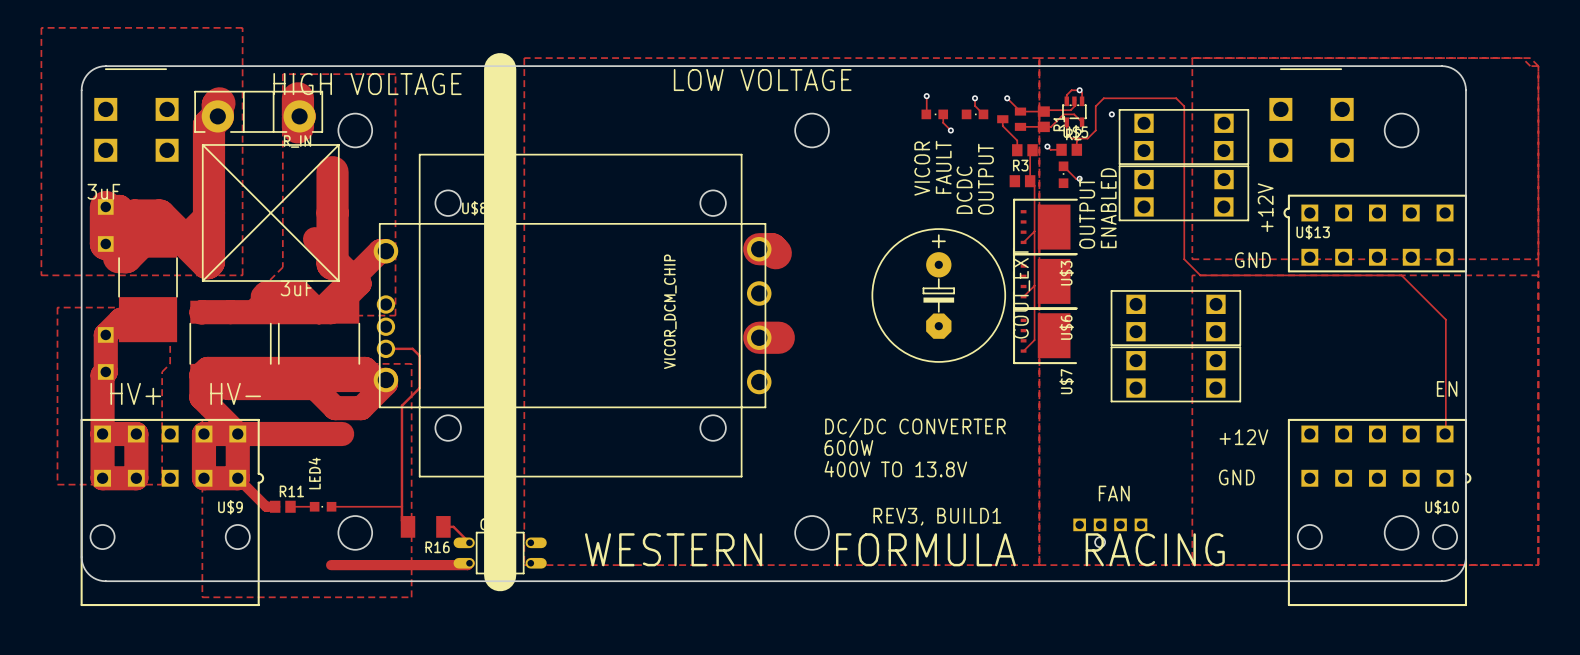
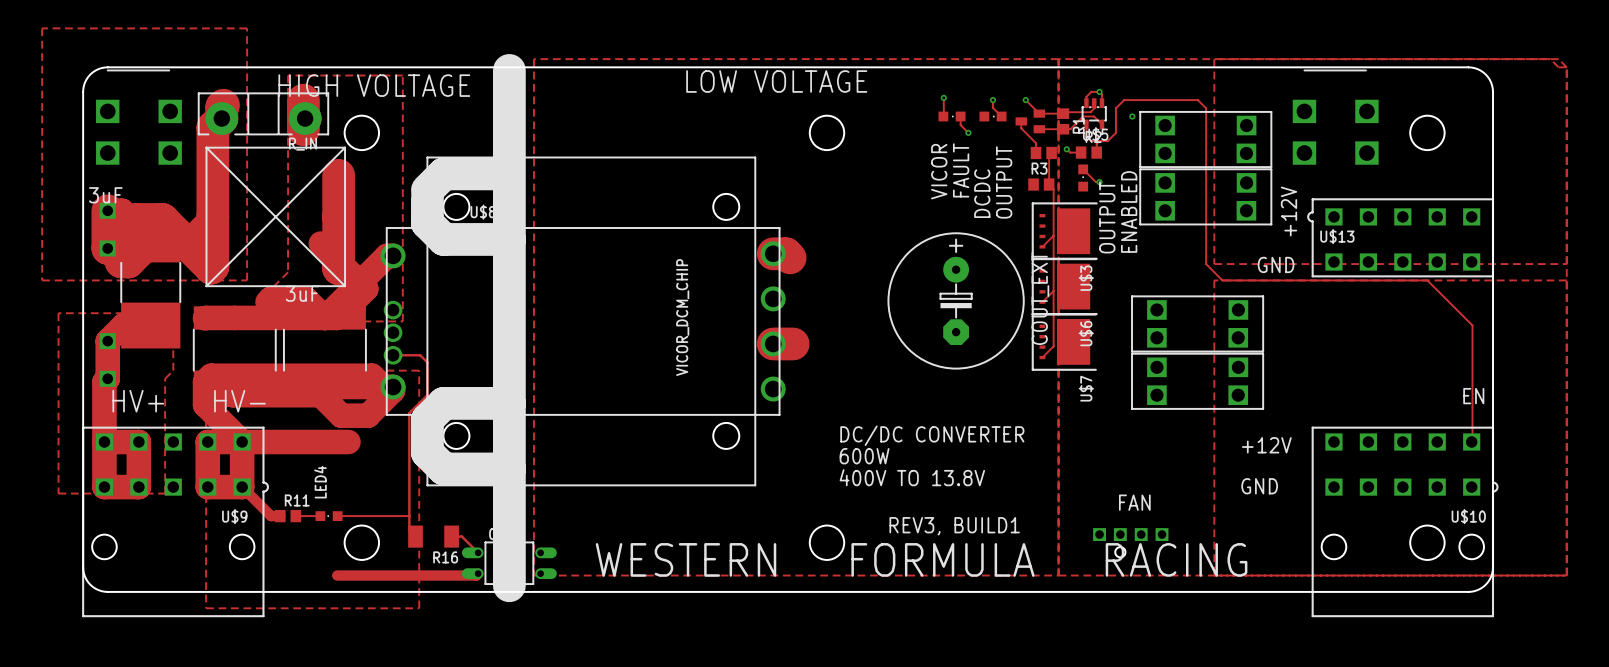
line: none -> (501, 173) (443, 173) (427, 190)
line: none -> (427, 198) (427, 223) (443, 239) (509, 239)
line: none -> (509, 403) (443, 403) (427, 419) (427, 452) (443, 468) (509, 468)

